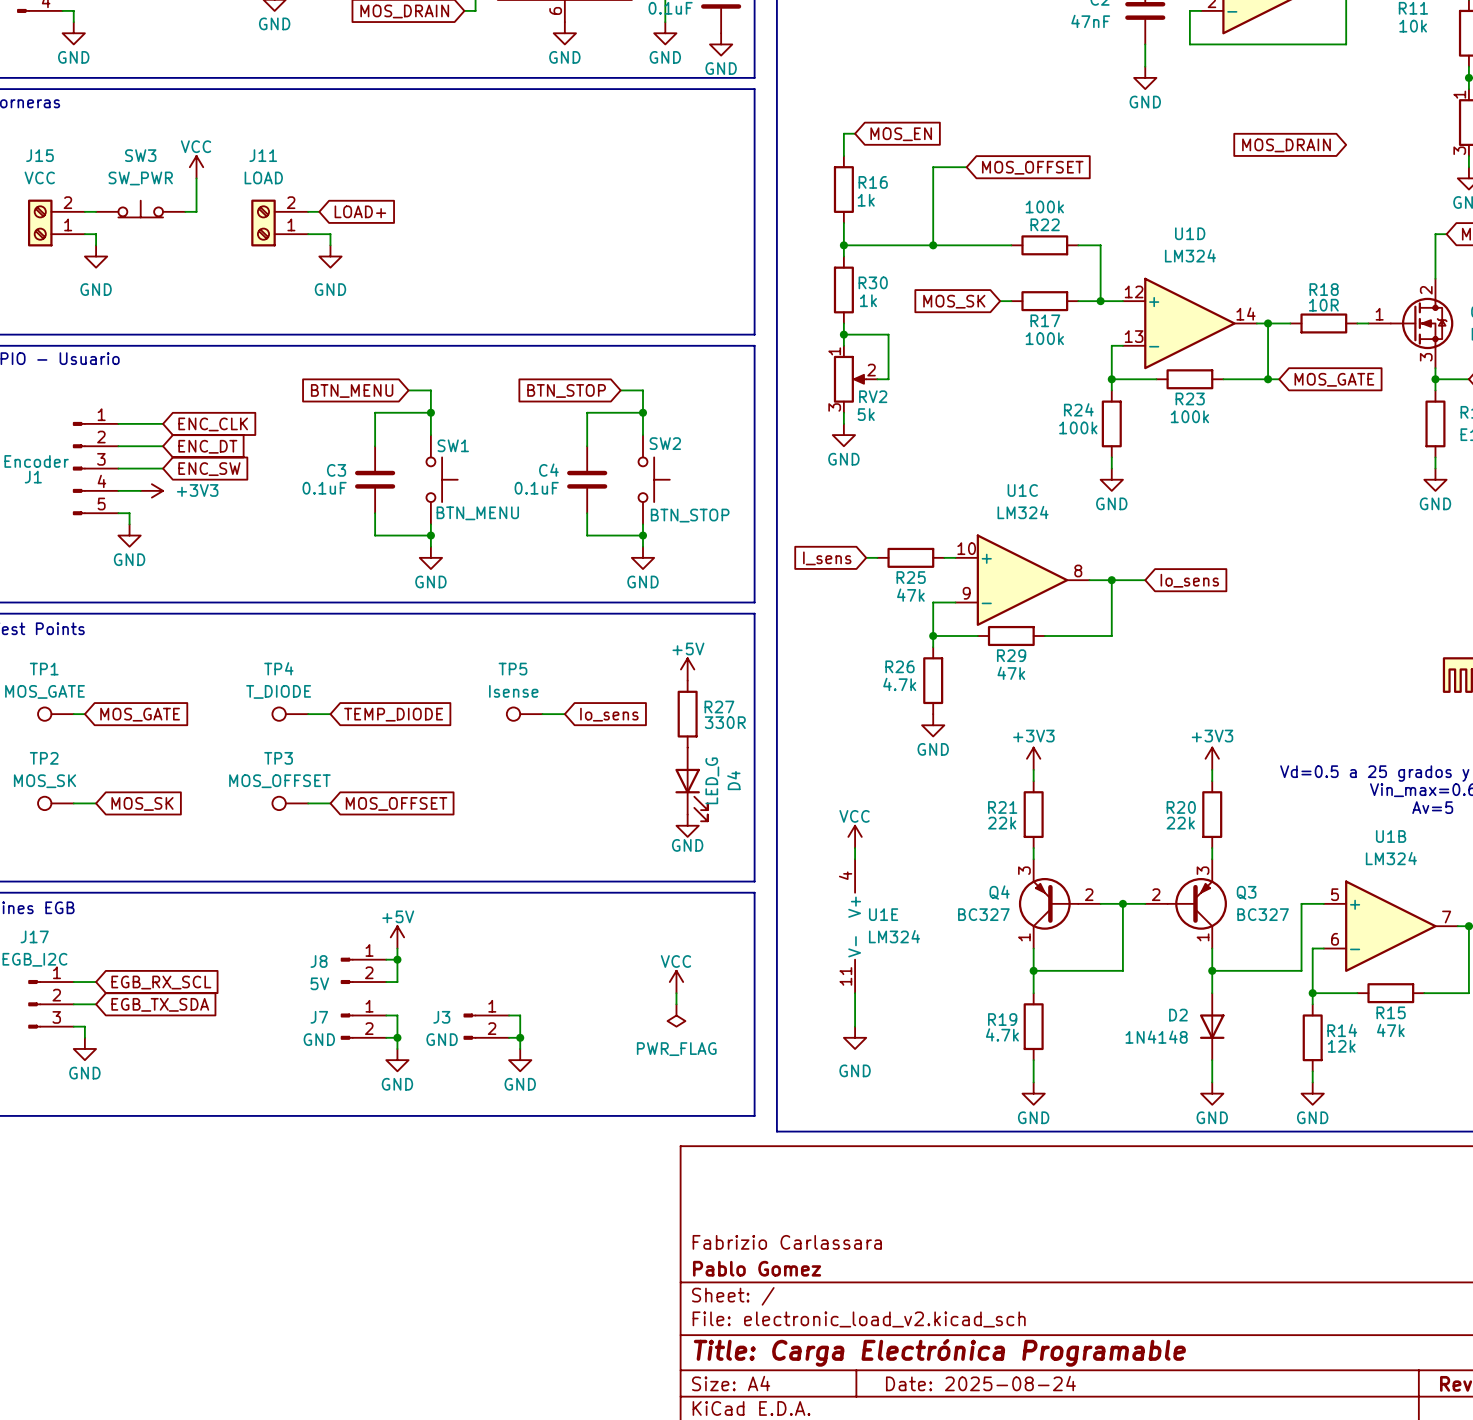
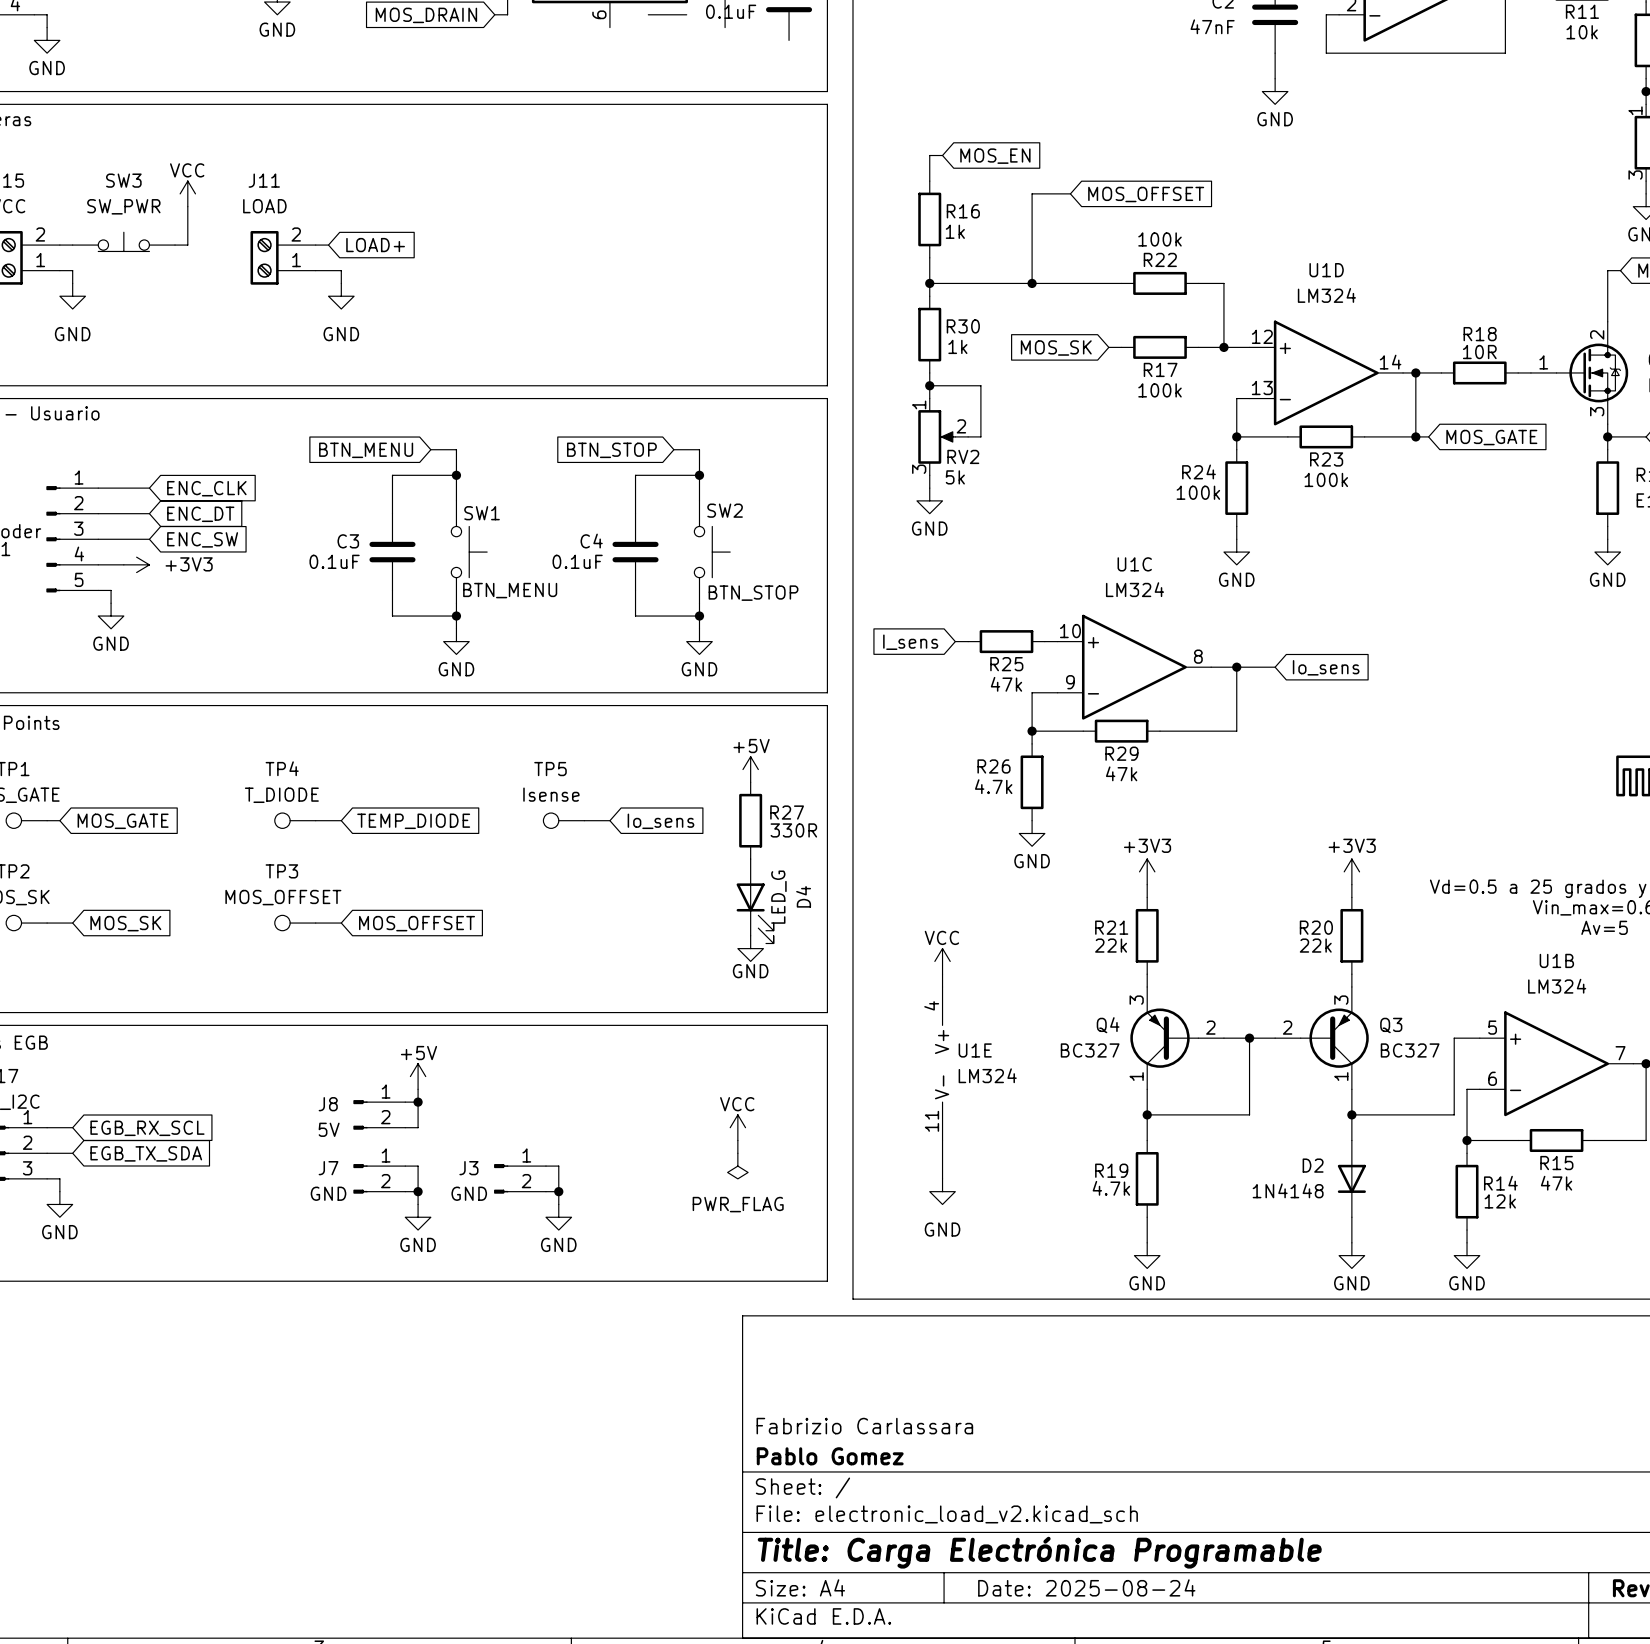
wire: none -> (648, 14) (686, 14)
power symbol: GND (564, 33) -> none
power symbol: GND (665, 33) -> none
power symbol: GND (721, 44) -> none
global label: MOS_DRAIN (1286, 145) -> none

